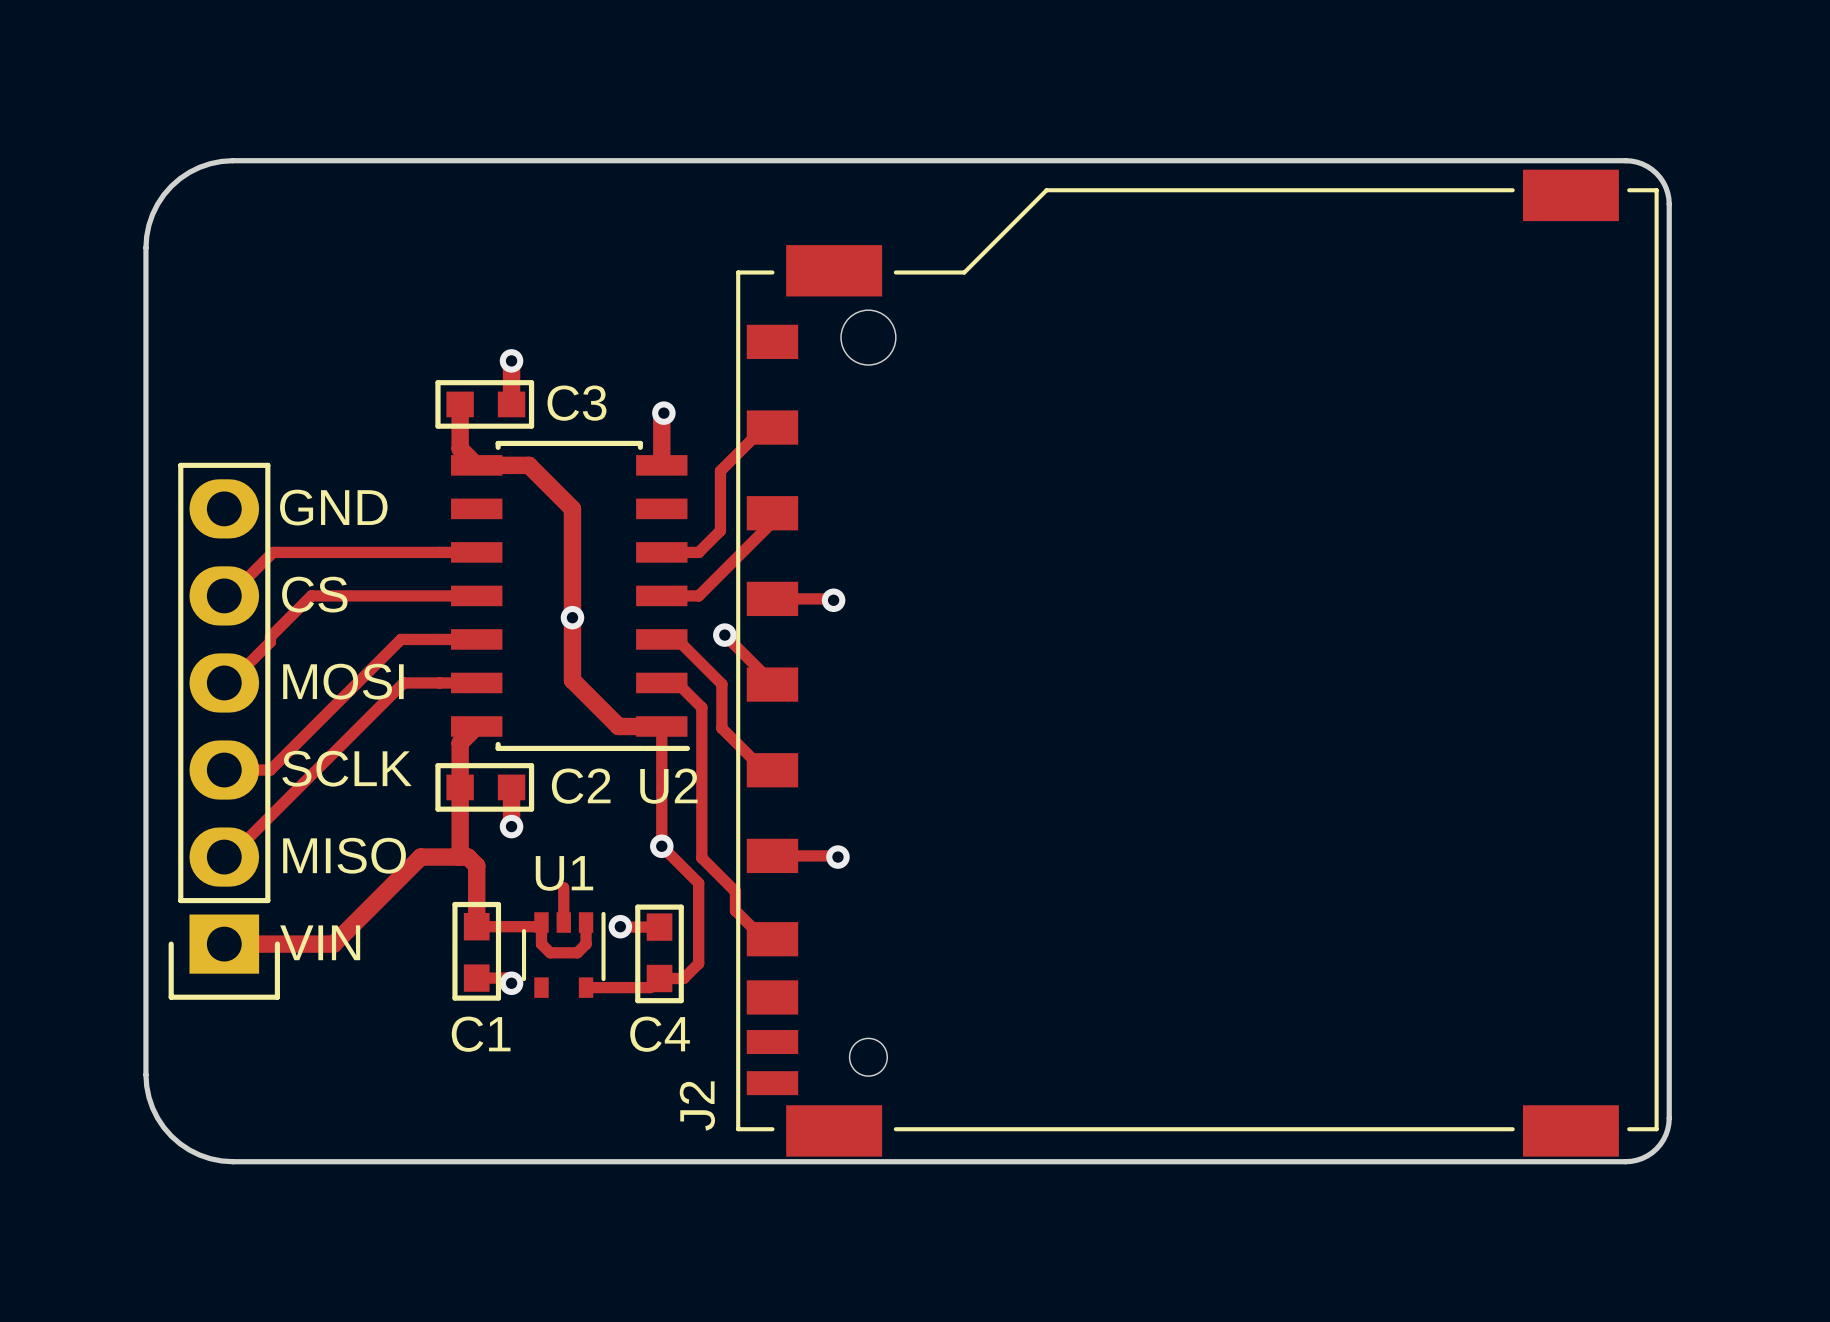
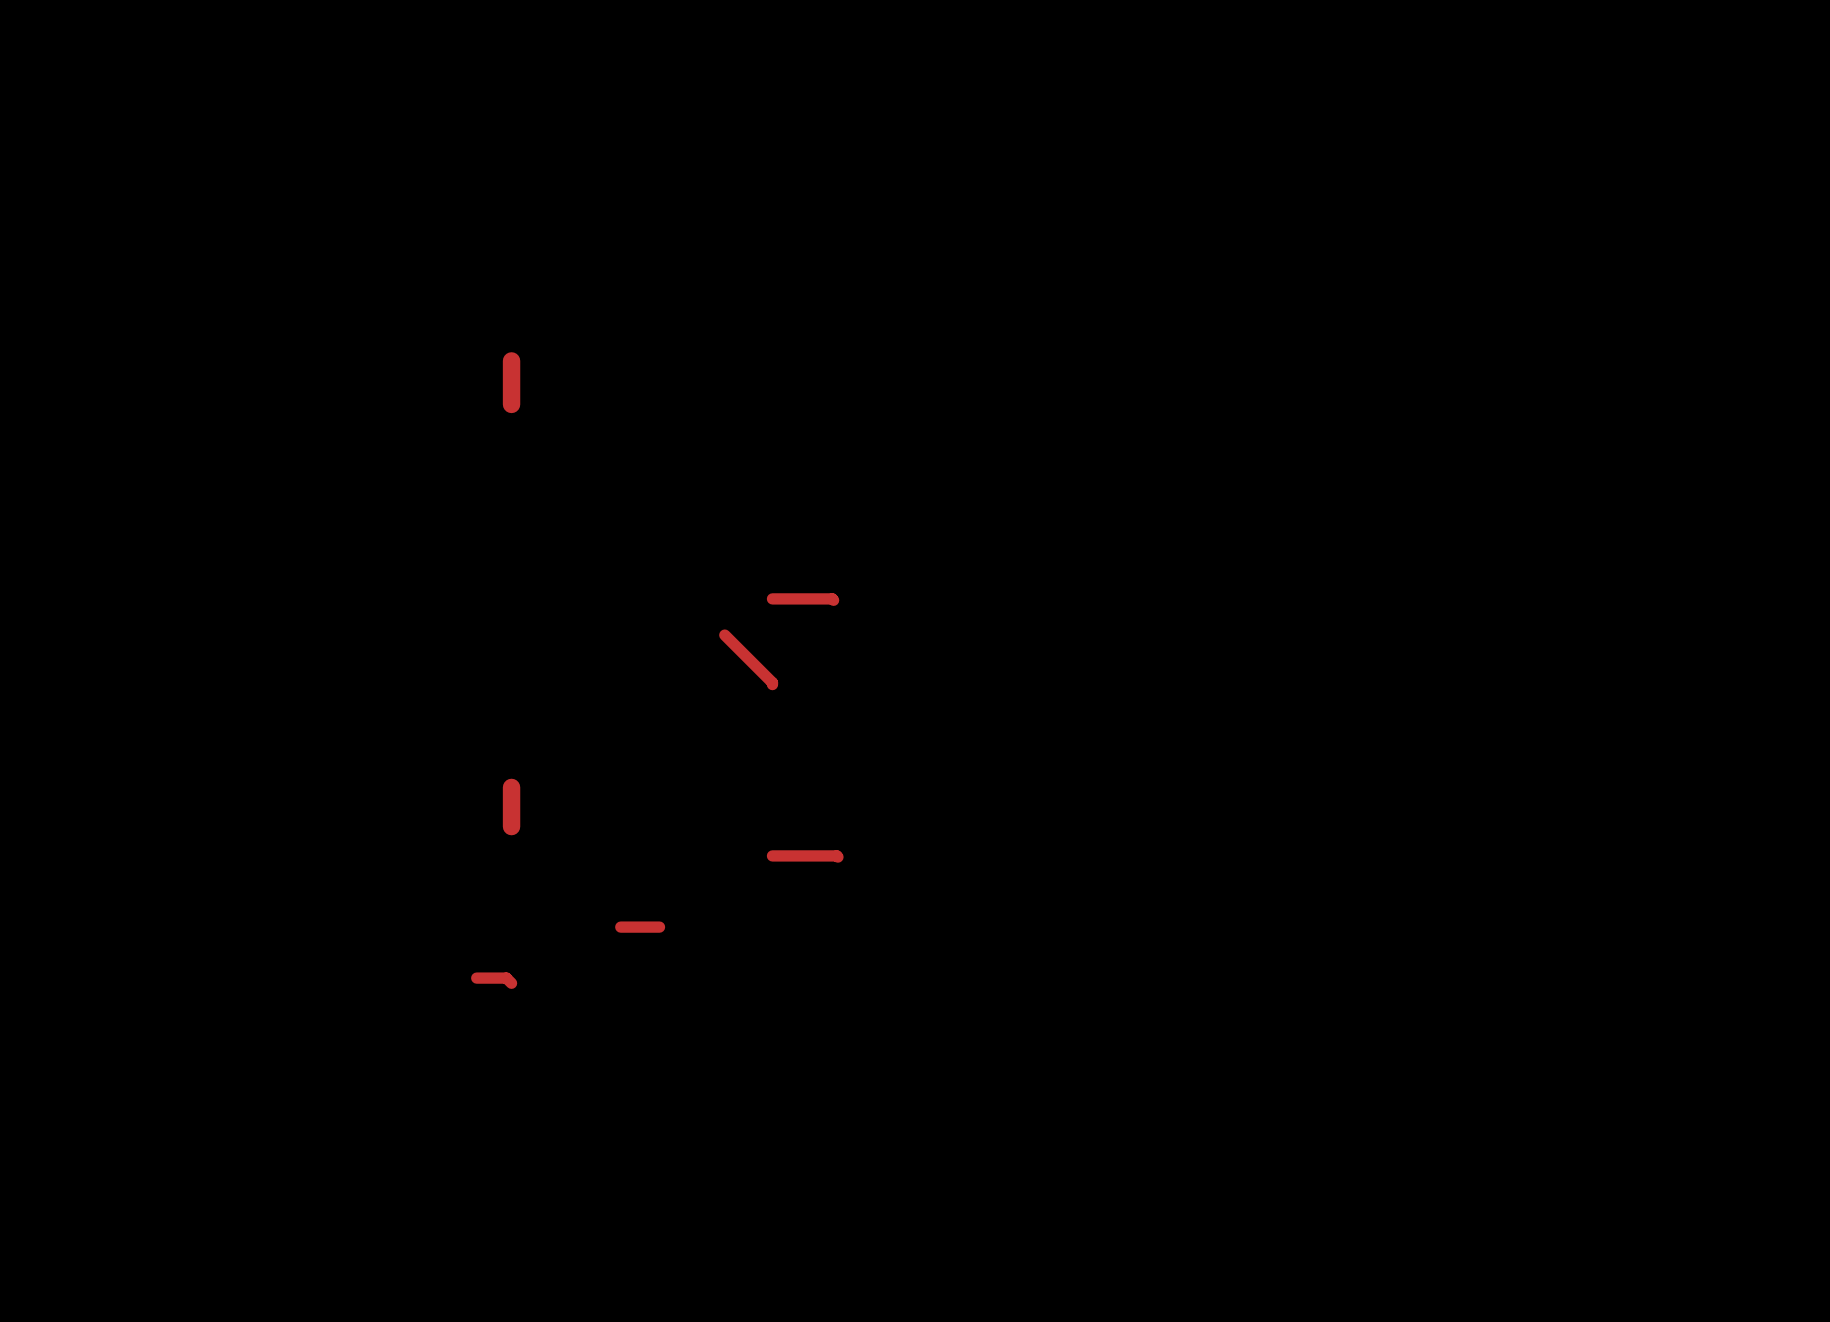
board edge: (233, 160) (1625, 160) (1642, 164) (1652, 169) (1663, 182) (1669, 204) (1669, 1118) (1665, 1134) (1660, 1144) (1647, 1155) (1625, 1161) (233, 1161) (210, 1158) (180, 1143) (157, 1118) (148, 1097) (145, 1074) (145, 247) (152, 214) (171, 186) (199, 167) (232, 160) -> none
via: (511, 360) -> none
track: (460, 404) (460, 448) (476, 465) (528, 465) (572, 508) (572, 680) (618, 726) (661, 726) (661, 846) (698, 883) (698, 963) (683, 978) (659, 978) (650, 987) (586, 987) -> none
C3: (484, 404) -> none
track: (663, 413) (661, 415) (661, 465) -> none
via: (663, 413) -> none
track: (772, 427) (763, 427) (720, 471) (720, 530) (698, 552) (661, 552) -> none
text: GND (333, 507) -> none
track: (772, 513) (772, 522) (698, 595) (661, 595) -> none
track: (476, 552) (273, 552) (229, 595) (224, 595) -> none
text: CS (314, 594) -> none
track: (476, 595) (311, 595) (270, 636) (270, 642) (229, 682) (224, 682) -> none
U2: (570, 595) -> none
via: (833, 600) -> none
via: (572, 617) -> none
via: (724, 635) -> none
track: (476, 639) (401, 639) (270, 770) (224, 770) -> none
track: (661, 639) (677, 639) (721, 684) (721, 728) (763, 770) (772, 770) -> none
J2: (1197, 663) -> none
text: MOSI (343, 681) -> none
track: (476, 682) (403, 682) (229, 857) (224, 857) -> none
track: (661, 682) (677, 682) (701, 707) (701, 858) (735, 891) (735, 910) (763, 939) (772, 939) -> none
track: (476, 726) (460, 743) (459, 857) -> none
part: (224, 731) -> none
text: SCLK (347, 768) -> none
C2: (484, 787) -> none
via: (511, 826) -> none
via: (661, 846) -> none
text: MISO (344, 855) -> none
via: (837, 857) -> none
track: (563, 887) (563, 922) -> none
track: (586, 922) (586, 944) (577, 952) (550, 952) (541, 944) (541, 922) (537, 926) (476, 926) (476, 865) (468, 857) (420, 857) (333, 944) (224, 944) -> none
via: (620, 926) -> none
text: VIN (320, 942) -> none
C1: (476, 951) -> none
C4: (659, 953) -> none
U1: (563, 954) -> none
via: (511, 983) -> none

